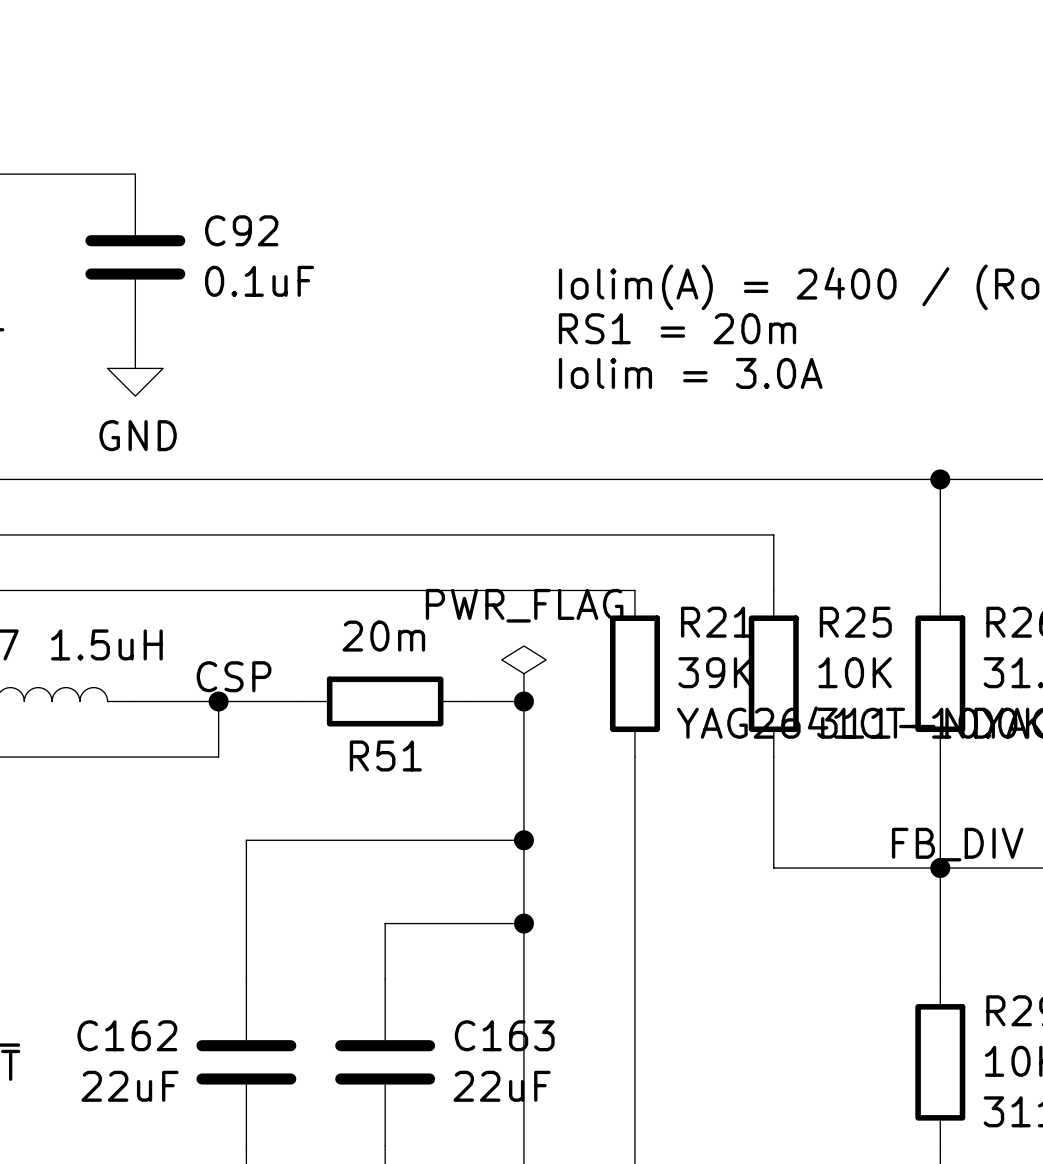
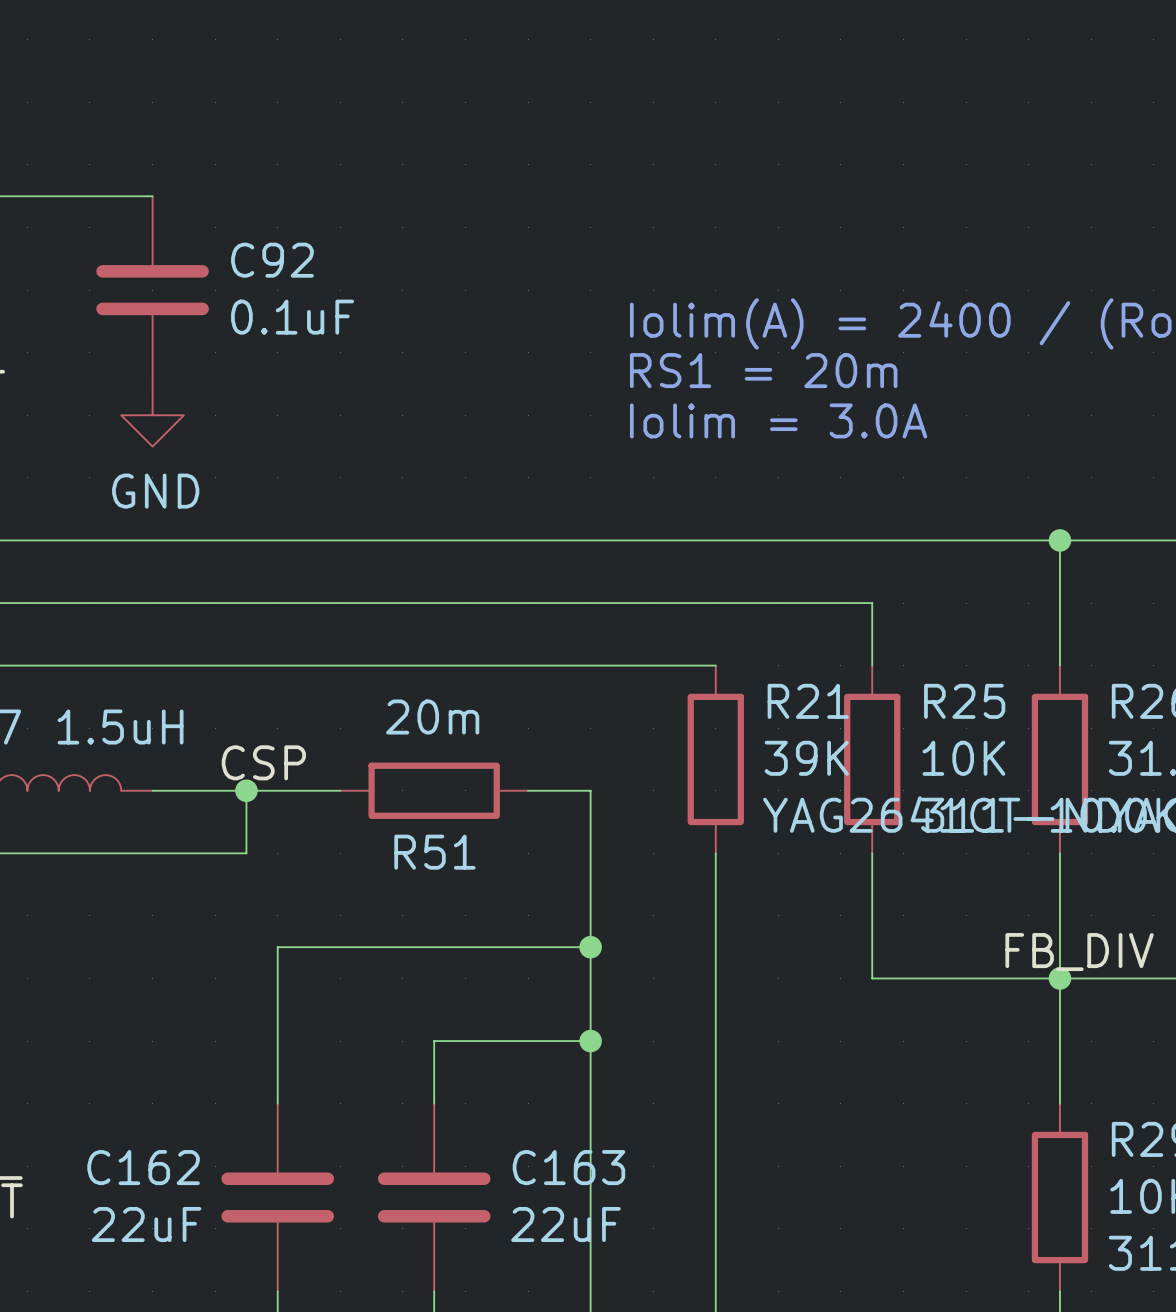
power symbol: PWR_FLAG (523, 673) -> none
junction: (523, 701) -> none

